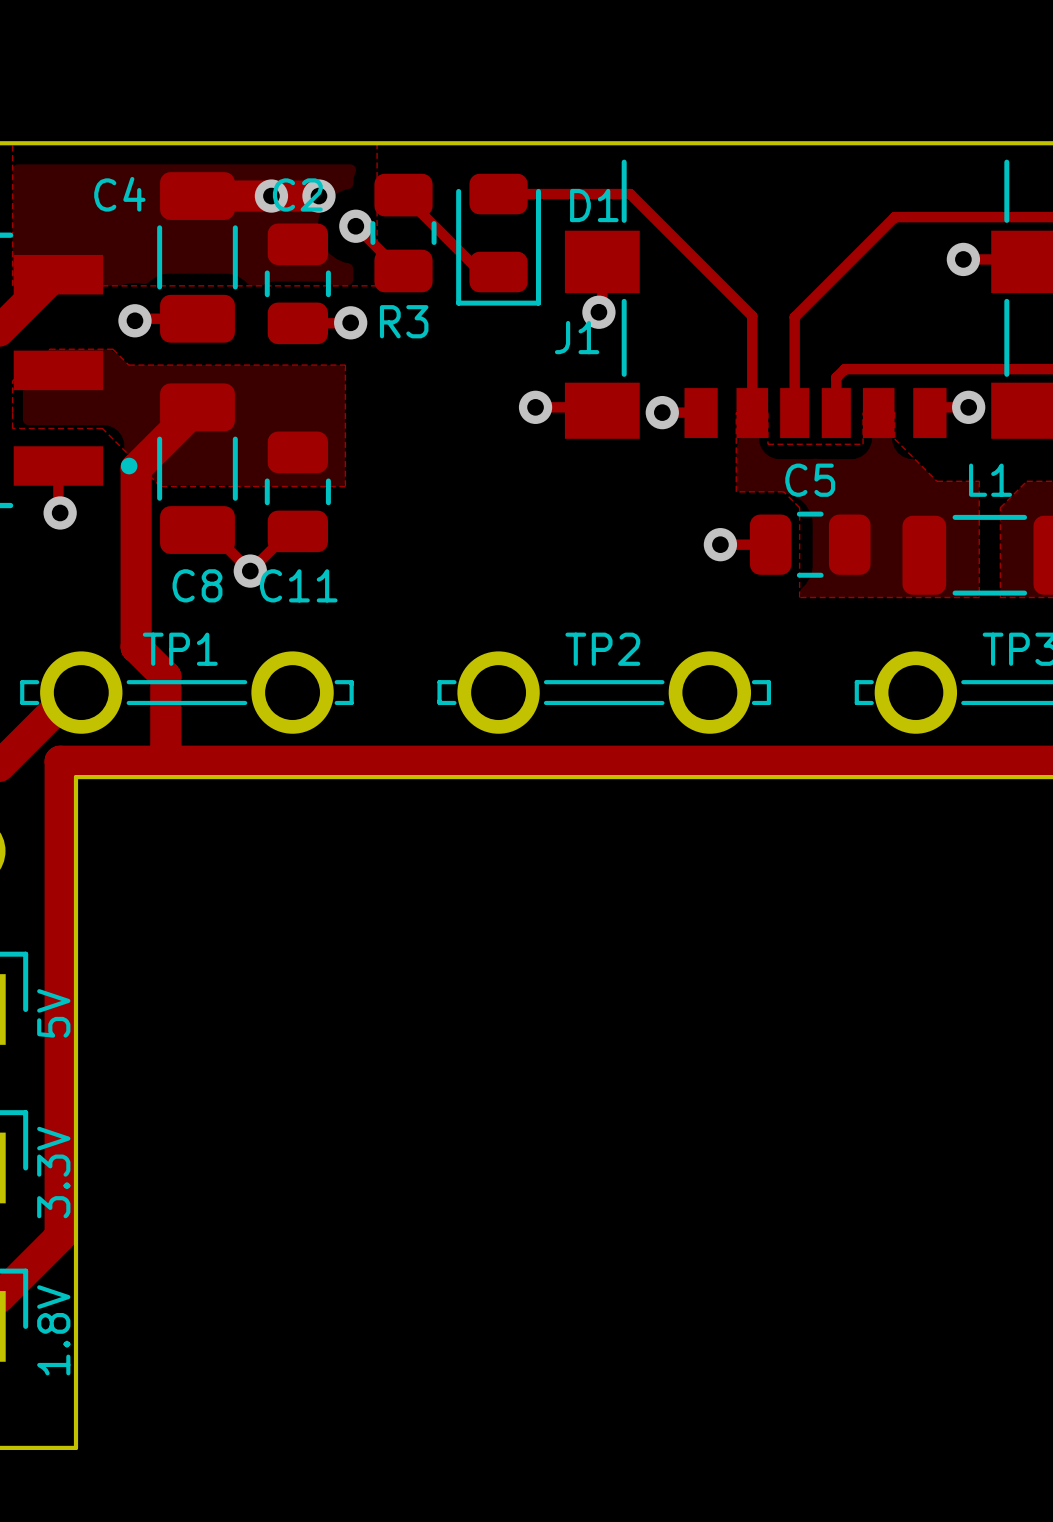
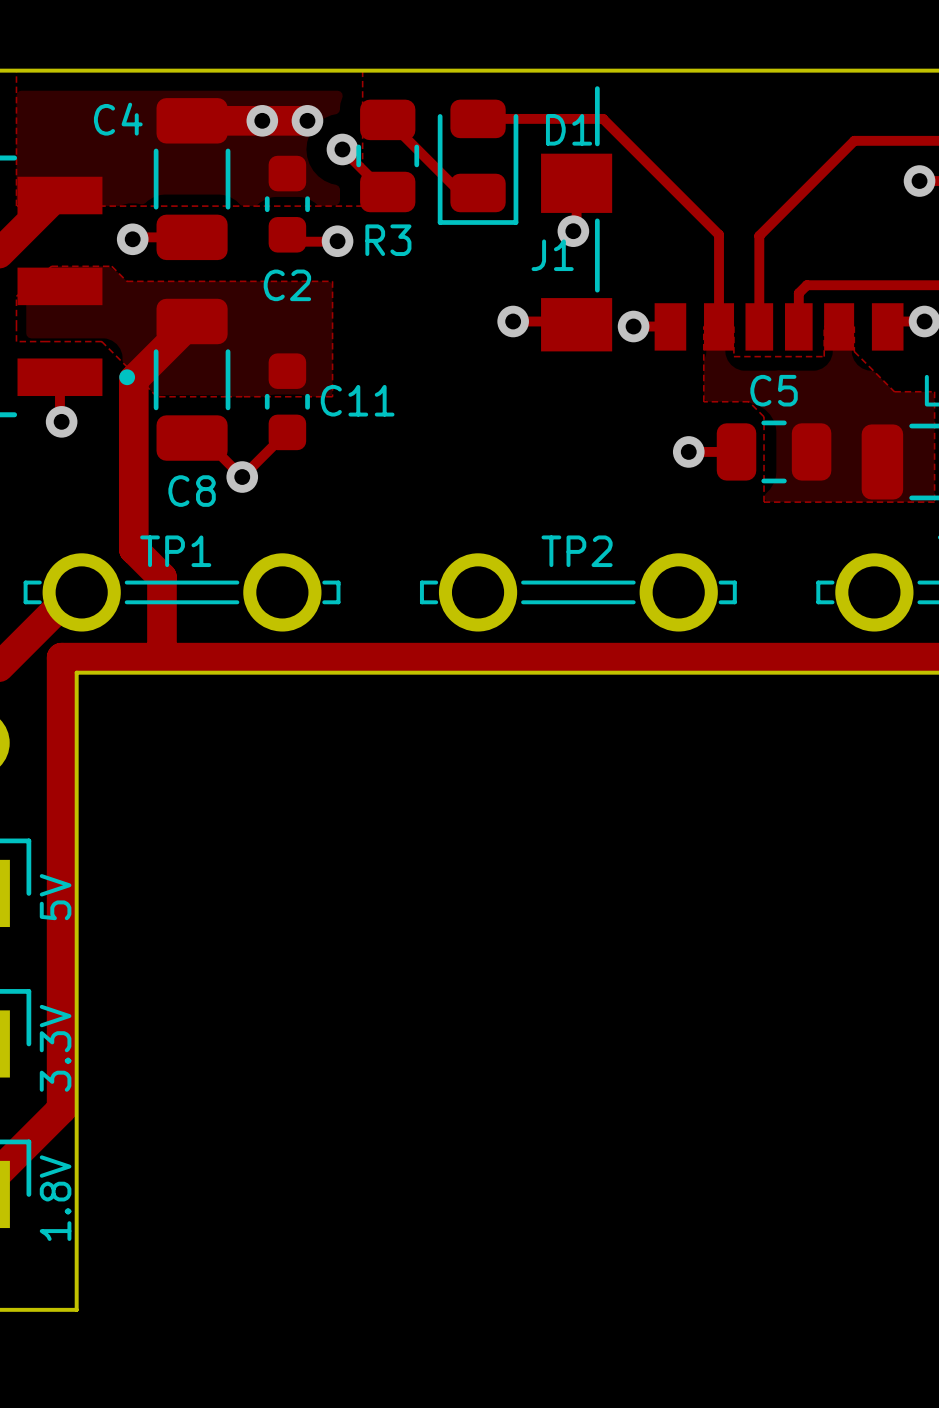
C2 name position: C2 (297, 194) -> C2 (287, 285)
C2 footprint: [264, 223, 331, 345] -> [264, 155, 310, 253]
C11 footprint: [264, 431, 331, 553] -> [264, 353, 310, 451]
C11 name position: C11 (298, 585) -> C11 (357, 400)

